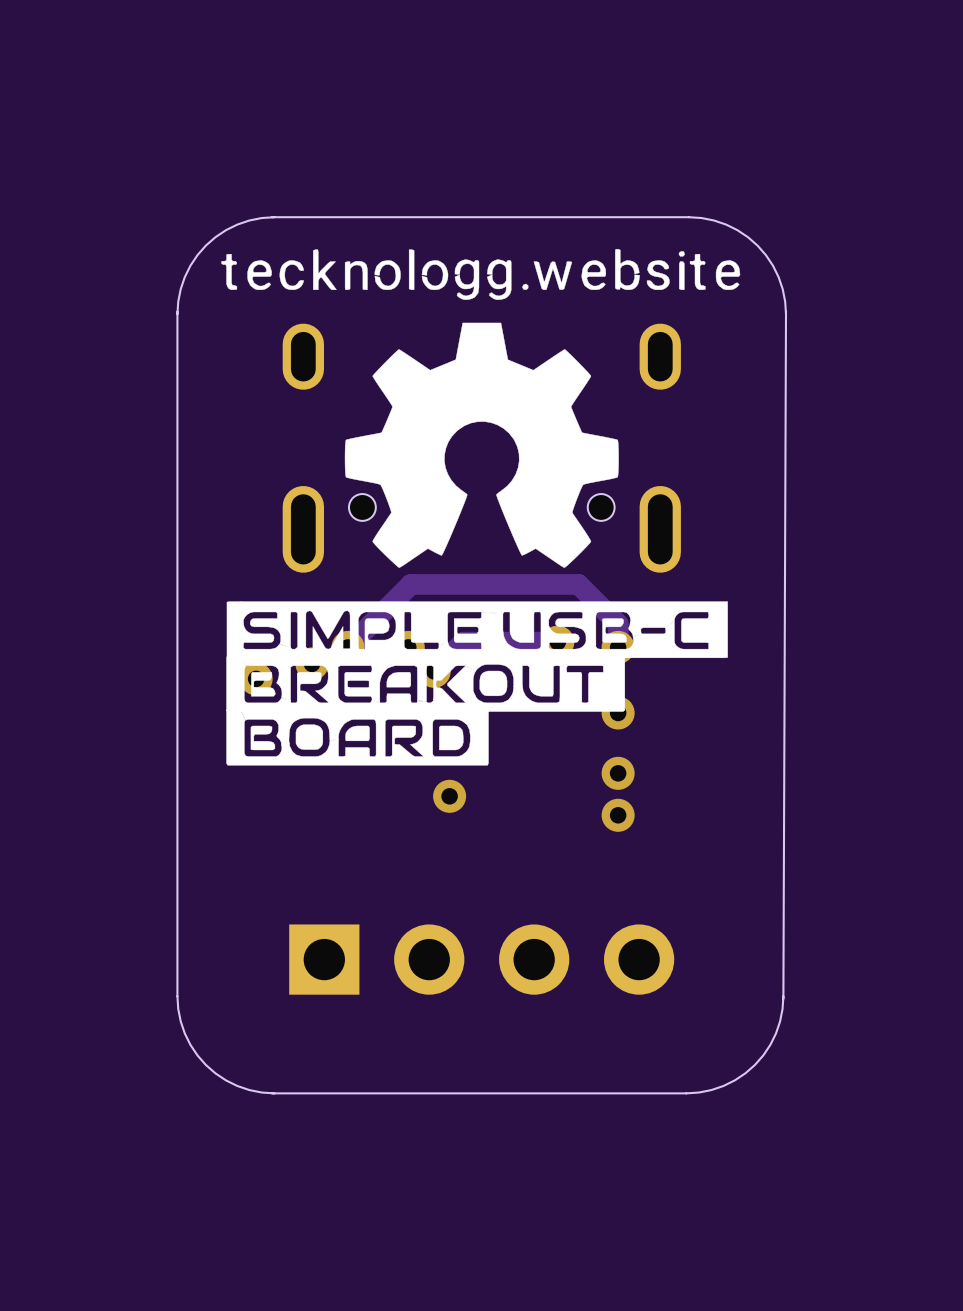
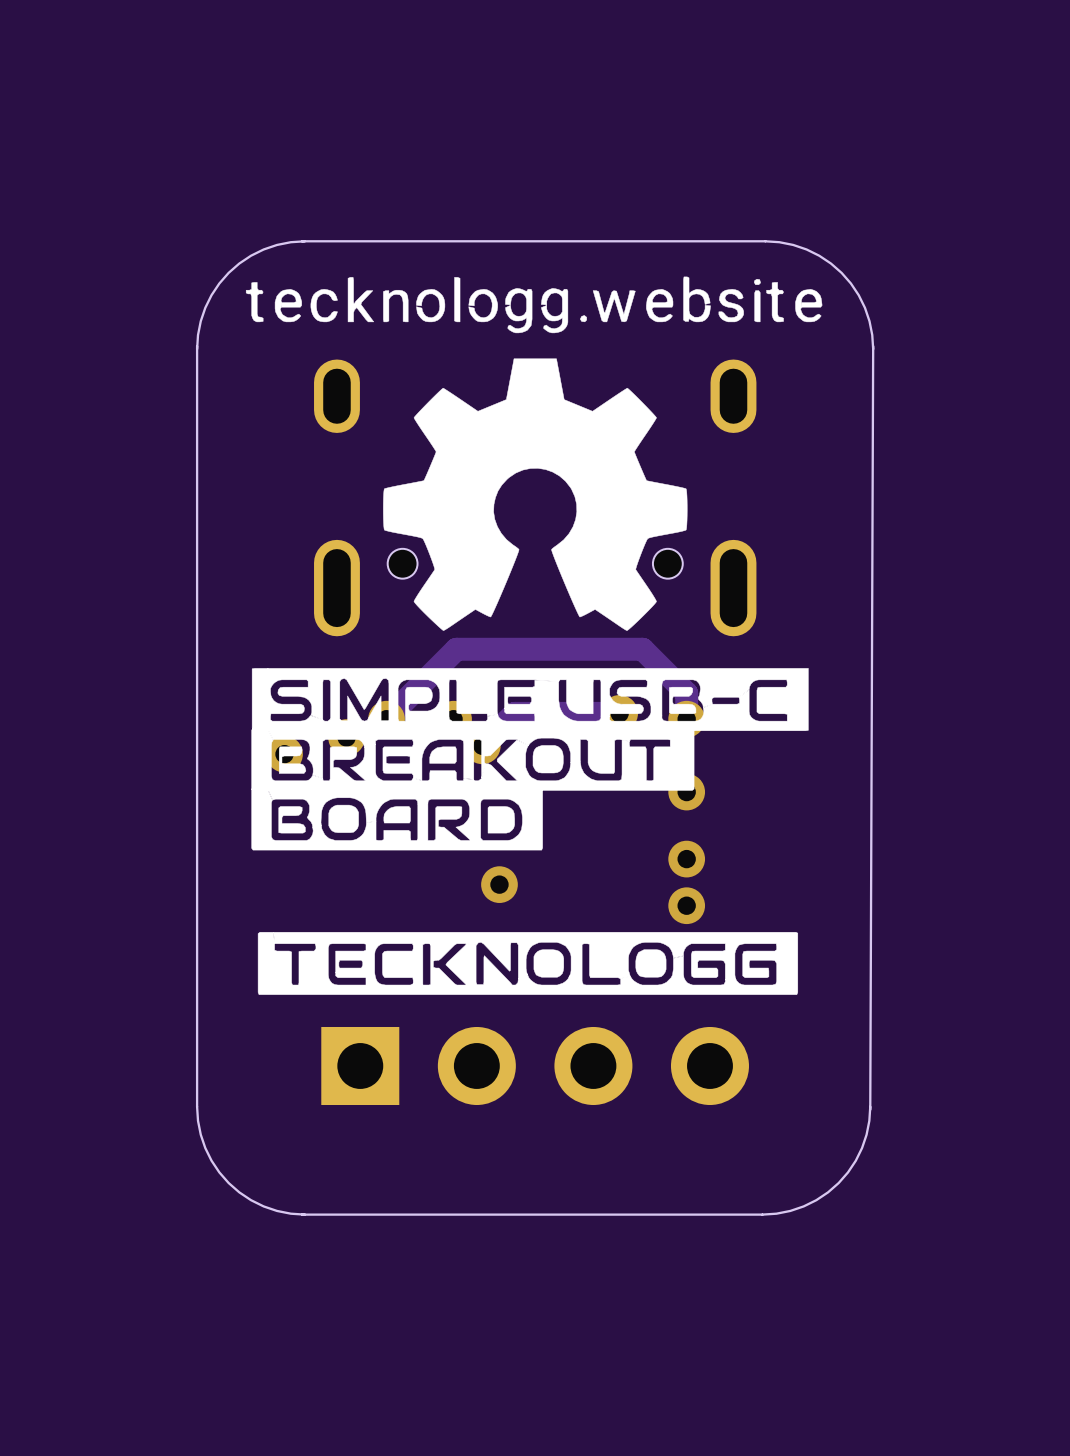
drawing: none -> [257, 932, 799, 995]

